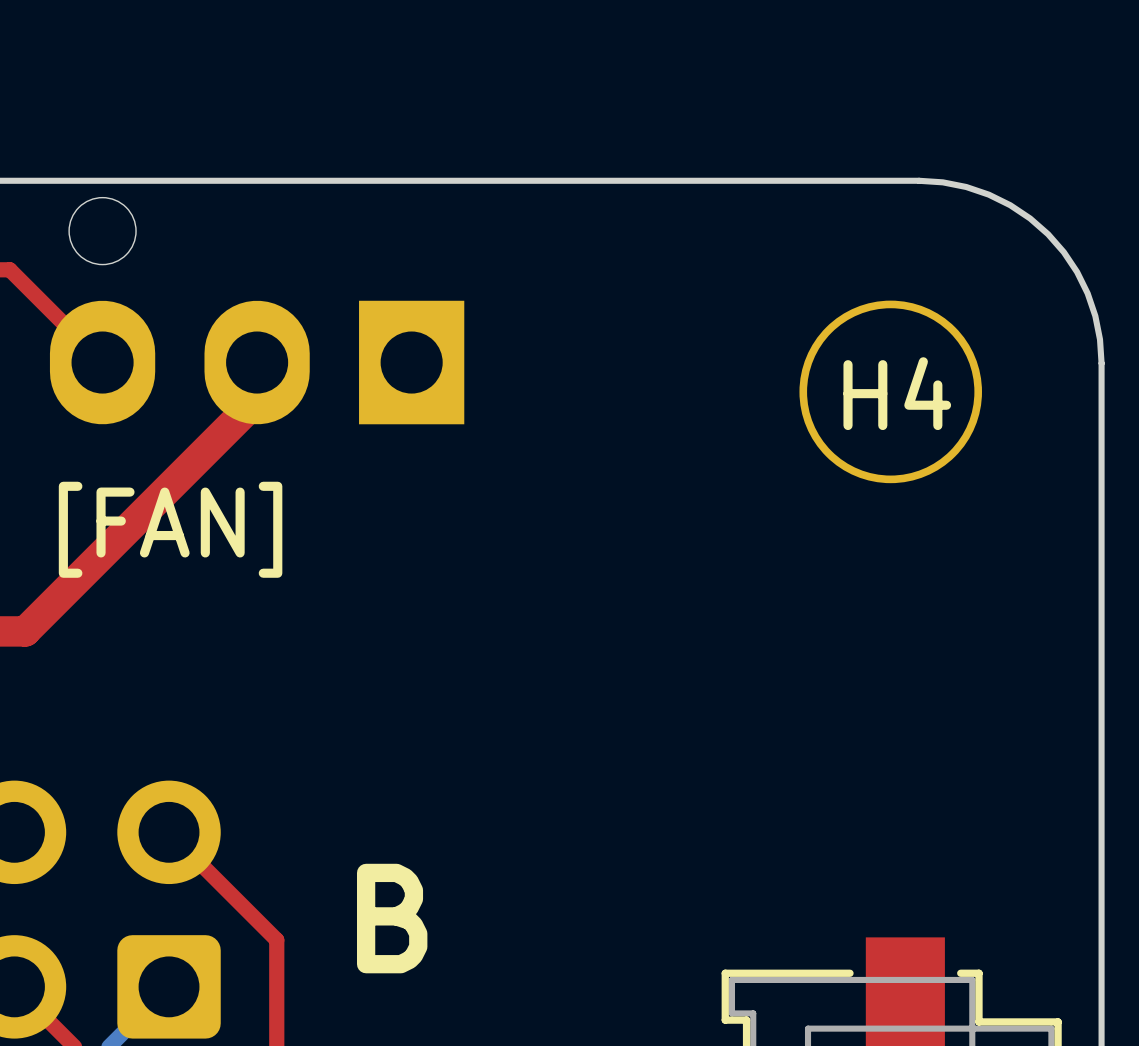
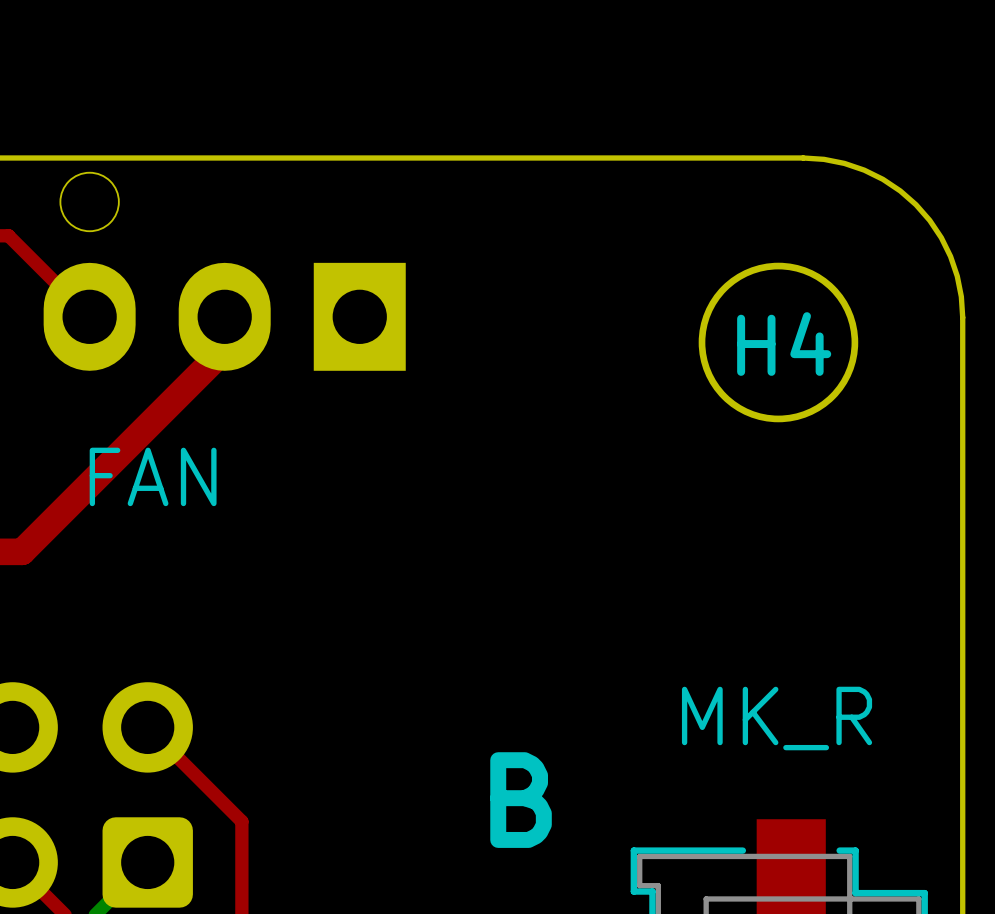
text: [FAN] (170, 529) -> FAN (153, 476)
text: none -> MK_R (777, 718)
text position: B (392, 918) -> B (521, 800)

